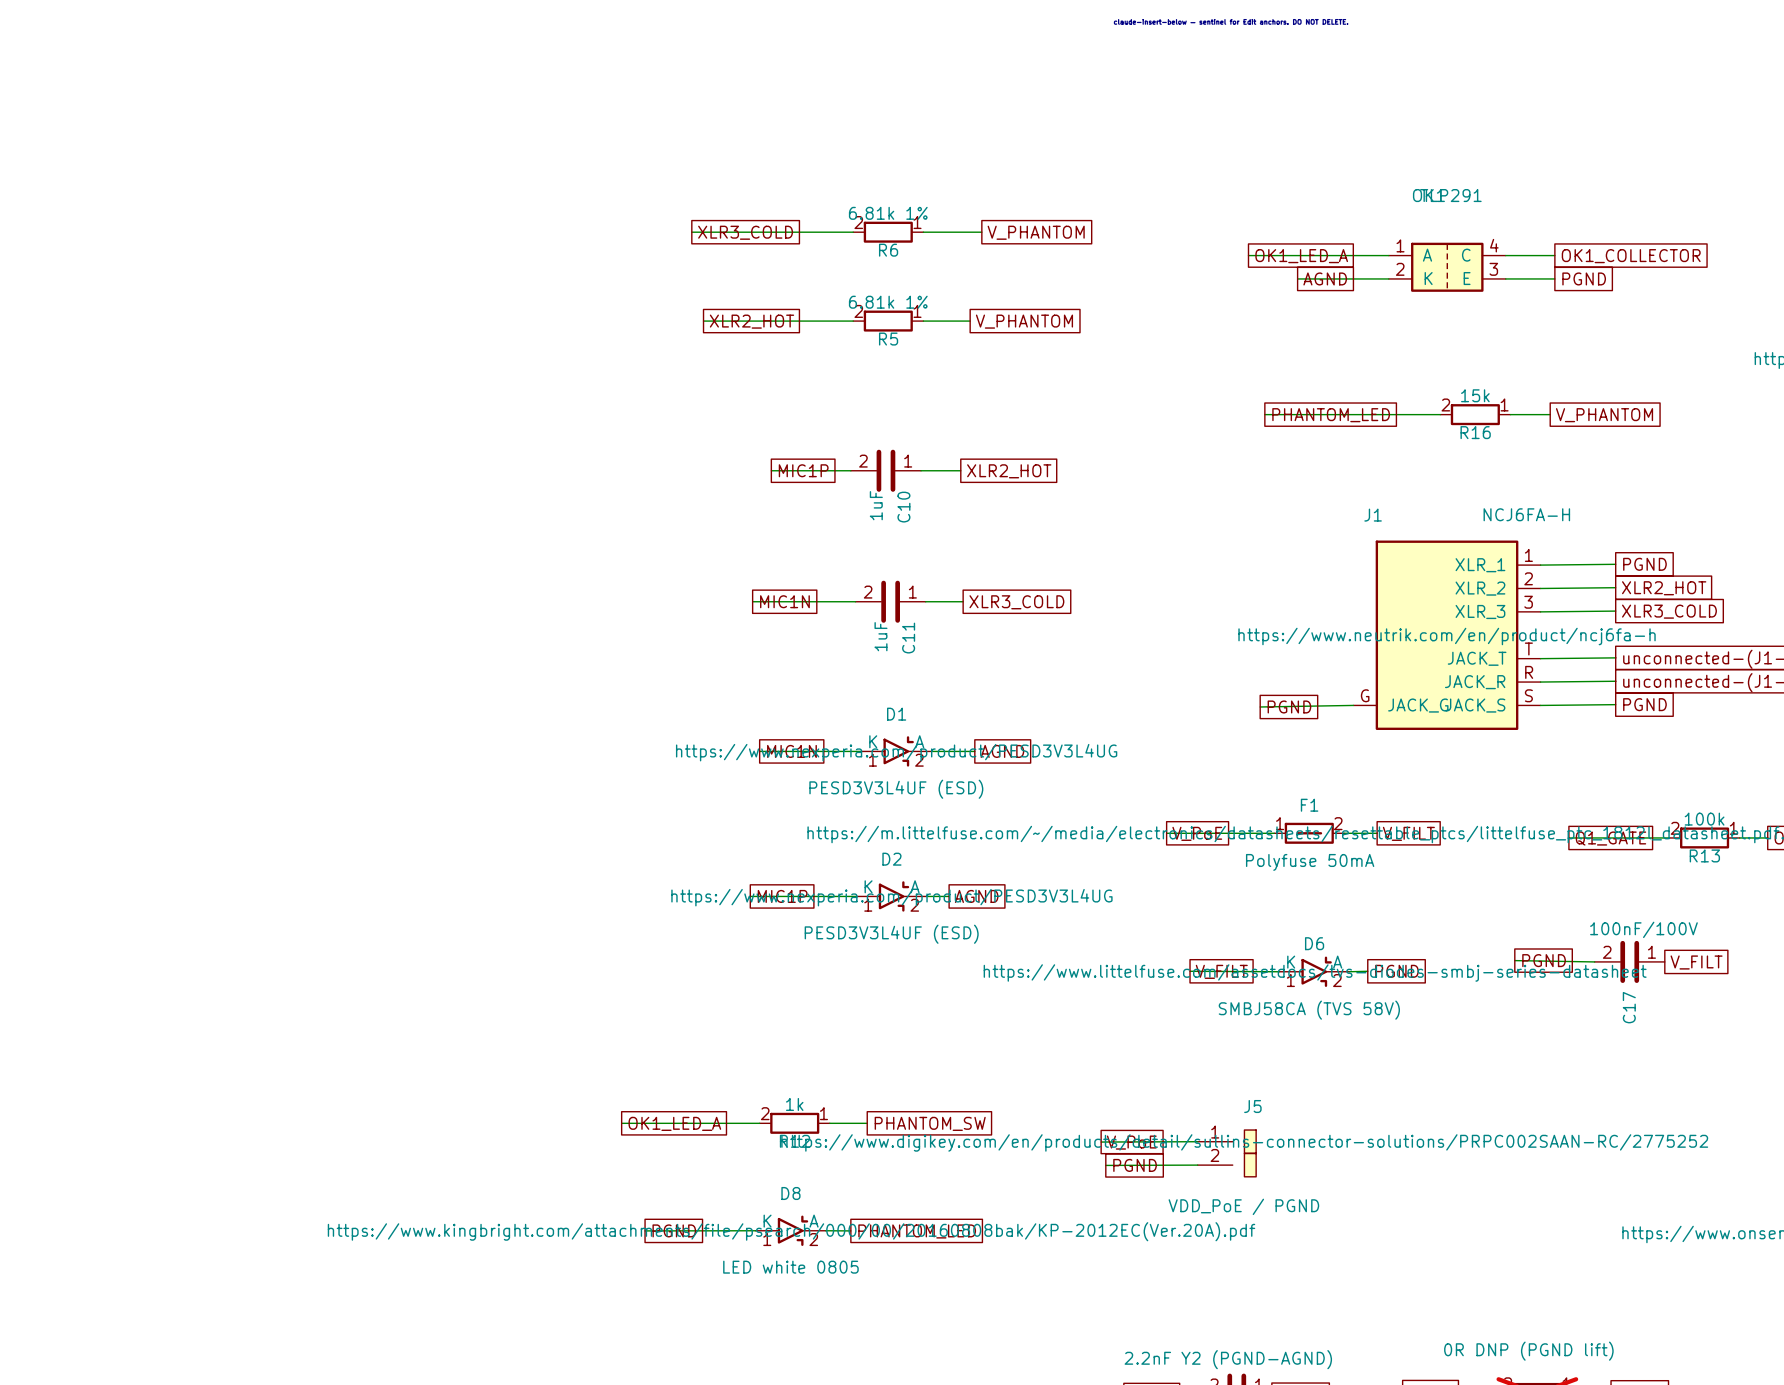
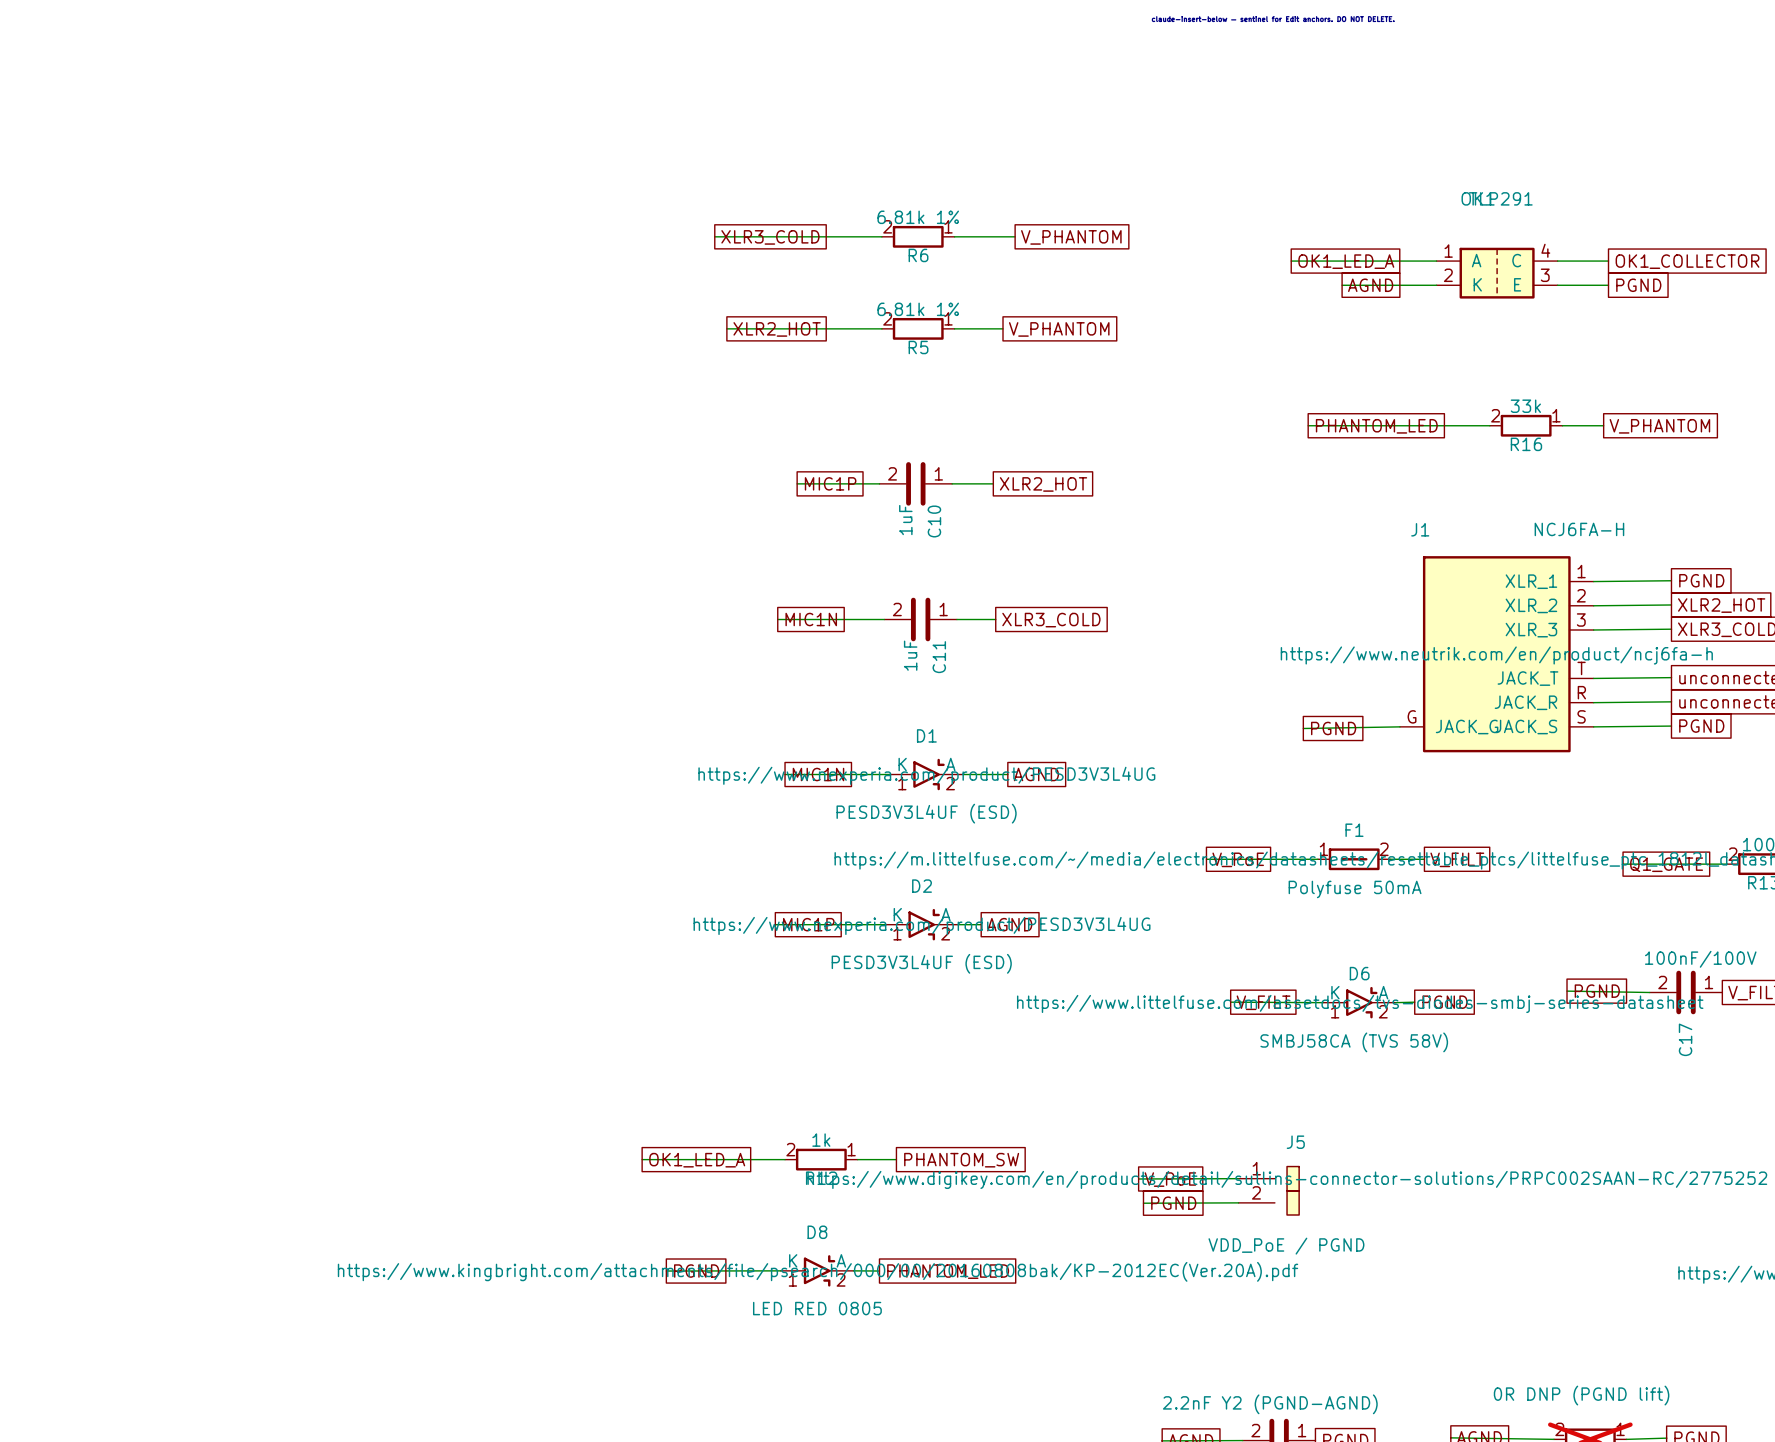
R16 value: 15k (1475, 395) -> 33k (1525, 406)
D8 value: LED white 0805 (790, 1267) -> LED RED 0805 (817, 1308)

